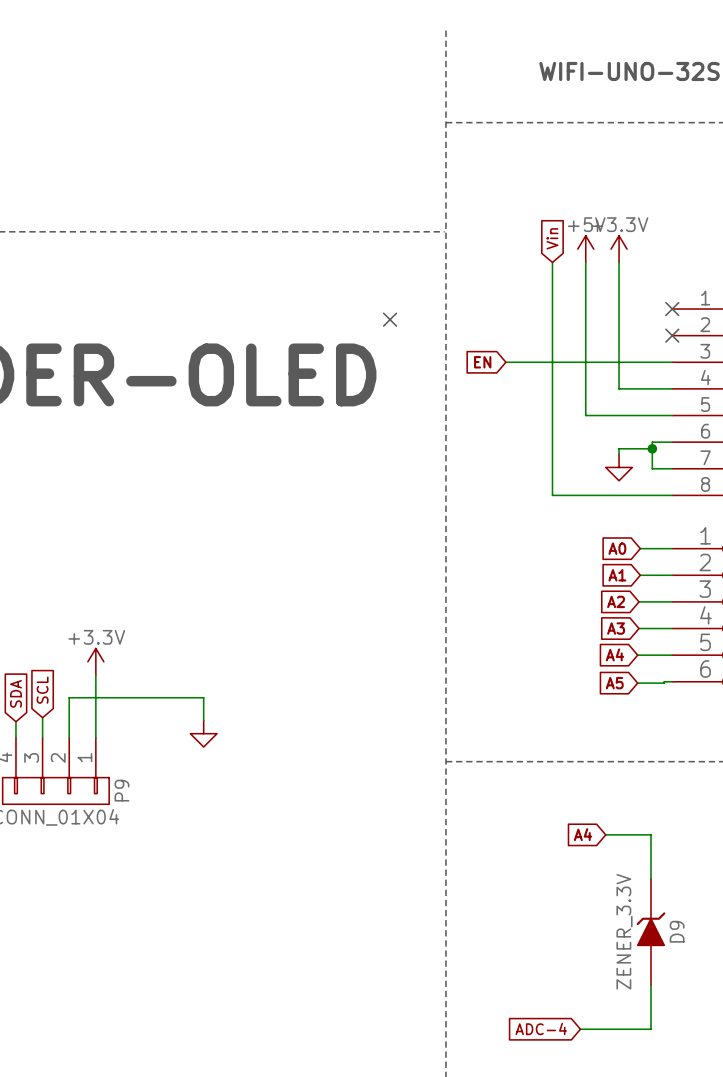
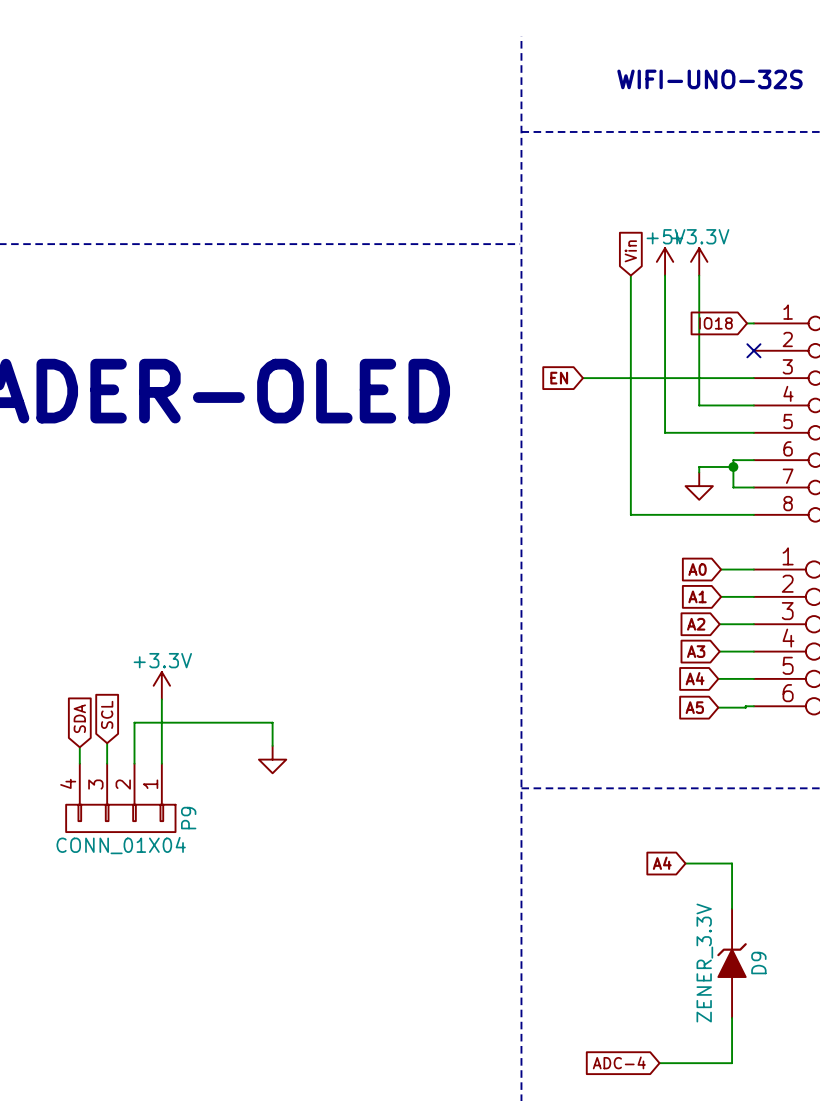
global label: none -> IO18 (715, 323)
wire: none -> (747, 323) (753, 323)
no-connect mark: (672, 309) -> none
no-connect mark: (390, 319) -> none

